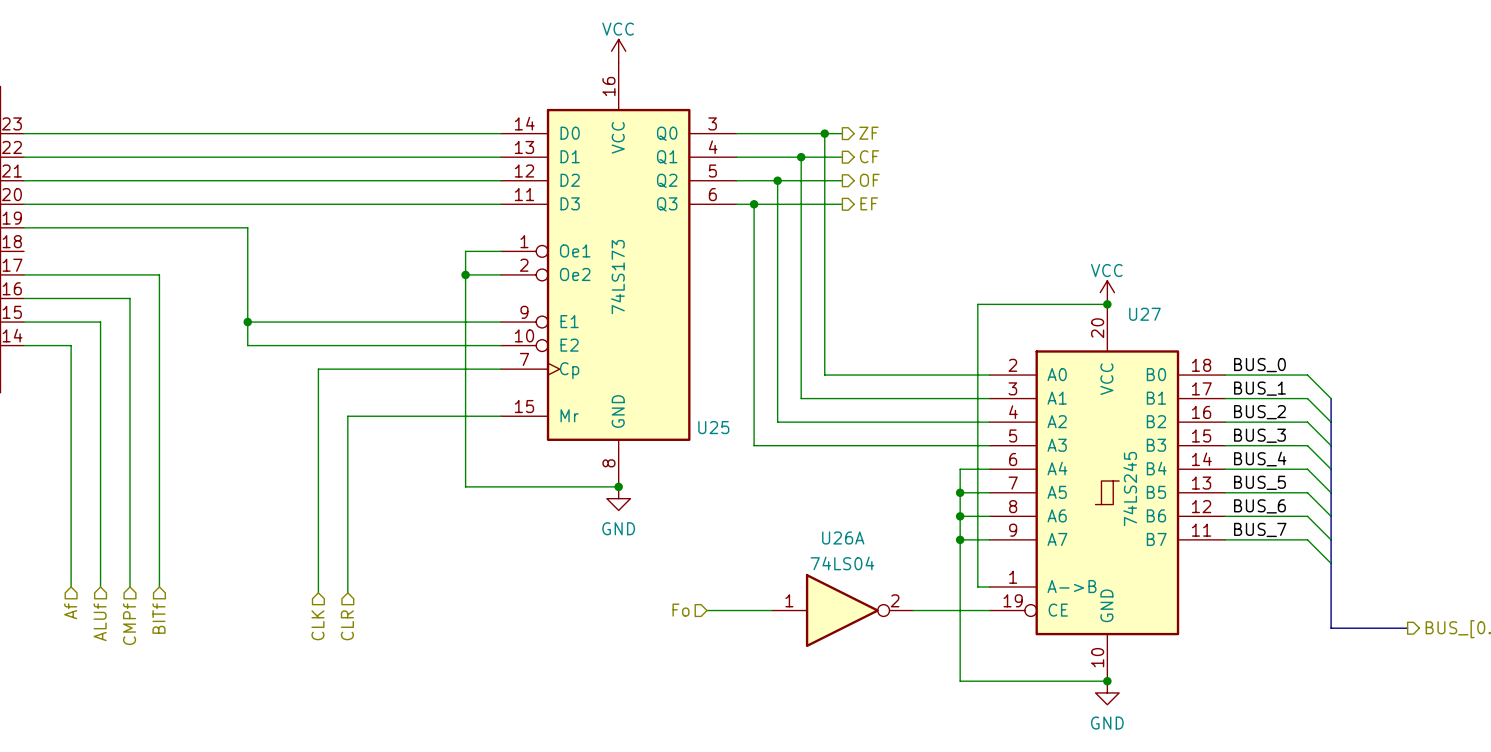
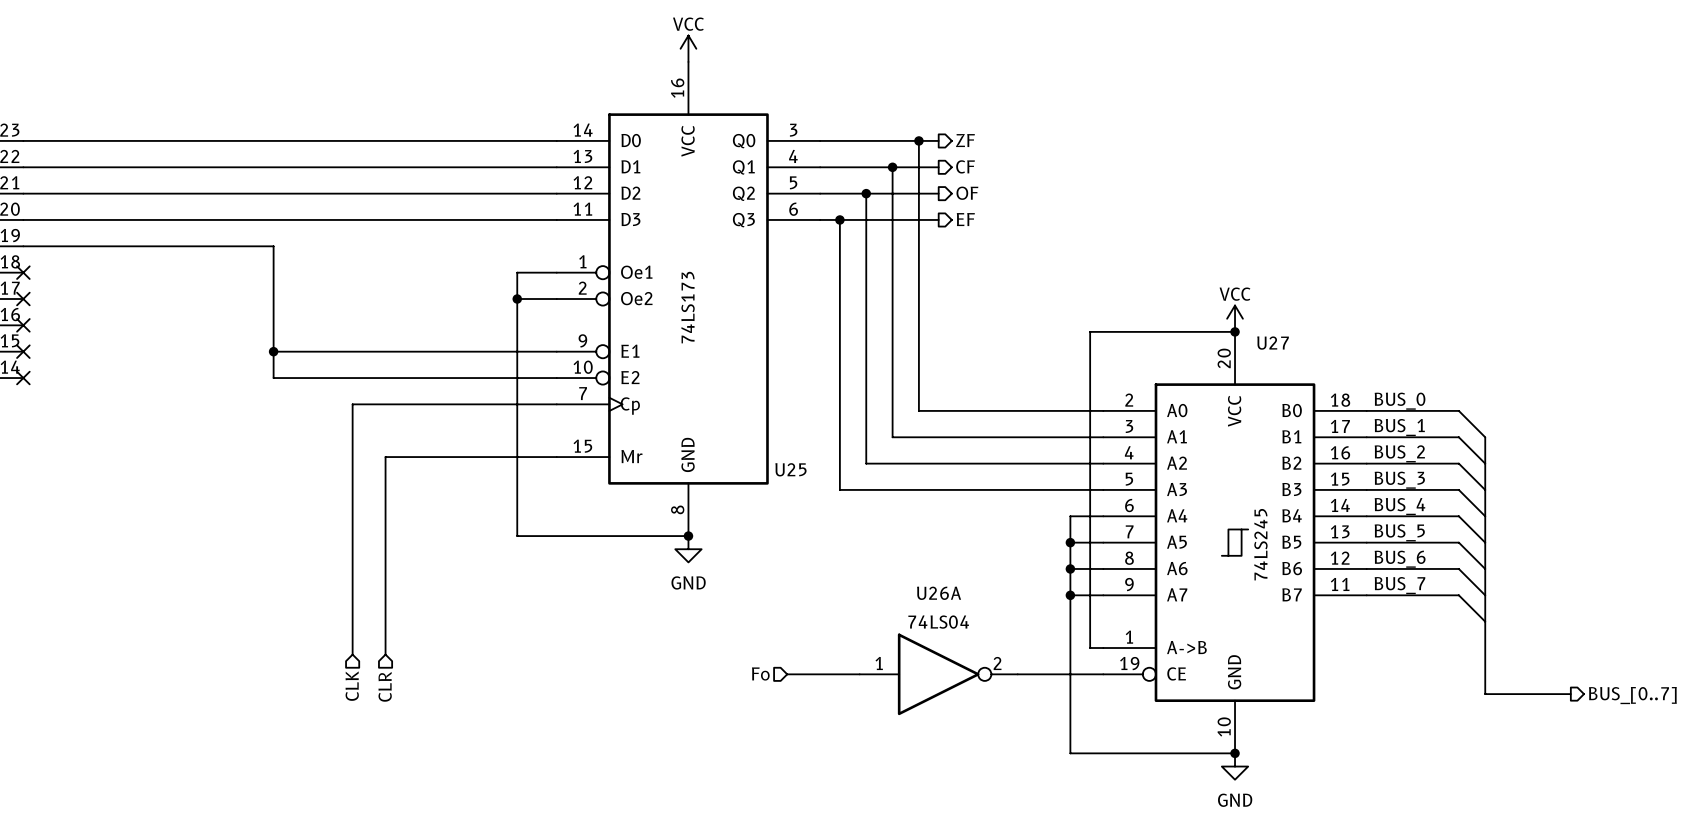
no-connect mark: none -> (23, 272)
wire: (24, 274) (159, 274) (159, 586) -> none
no-connect mark: none -> (23, 299)
wire: (24, 298) (129, 298) (129, 586) -> none
no-connect mark: none -> (23, 325)
wire: (24, 322) (100, 322) (100, 586) -> none
no-connect mark: none -> (23, 351)
wire: (24, 345) (71, 345) (71, 586) -> none
no-connect mark: none -> (23, 378)
hierarchical label: Af (70, 611) -> none
hierarchical label: BITf (158, 618) -> none
hierarchical label: ALUf (100, 622) -> none
hierarchical label: CMPf (129, 624) -> none

